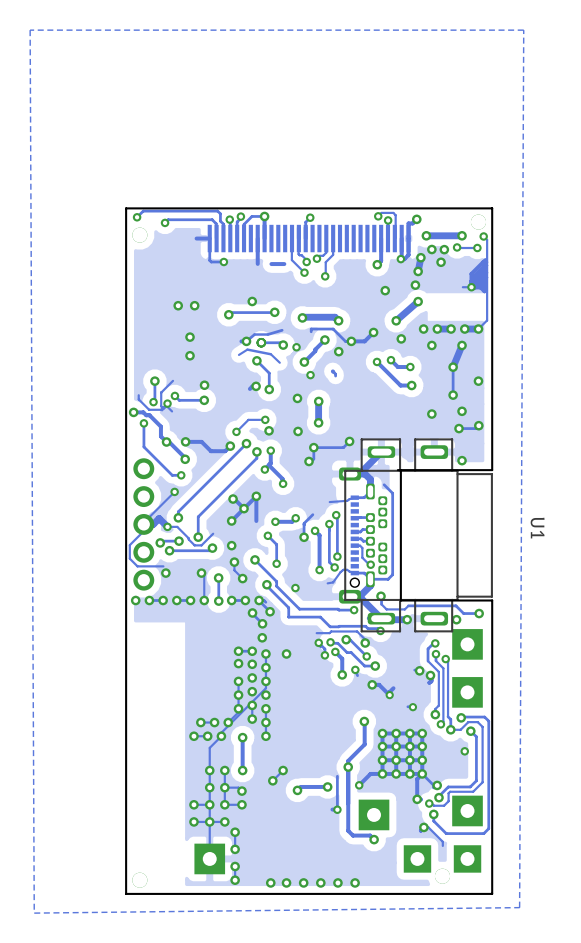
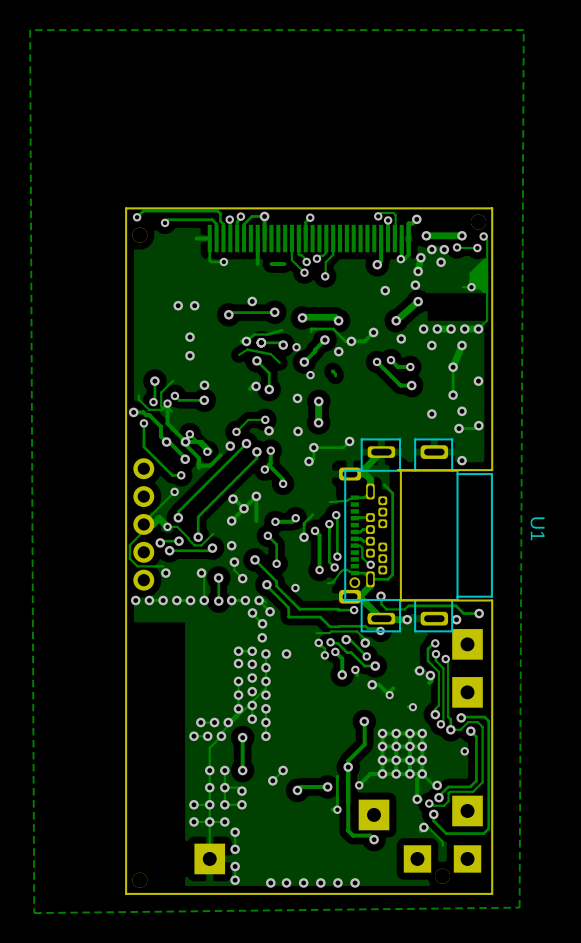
track: none -> (167, 403) (167, 423) (182, 438) (182, 443) (198, 457) (198, 467)
track: none -> (189, 434) (207, 451)
via: none -> (189, 434)
track: (230, 446) (225, 451) (210, 451) (216, 451) -> none
via: none -> (207, 451)
track: none -> (220, 455) (210, 465) (198, 465)

